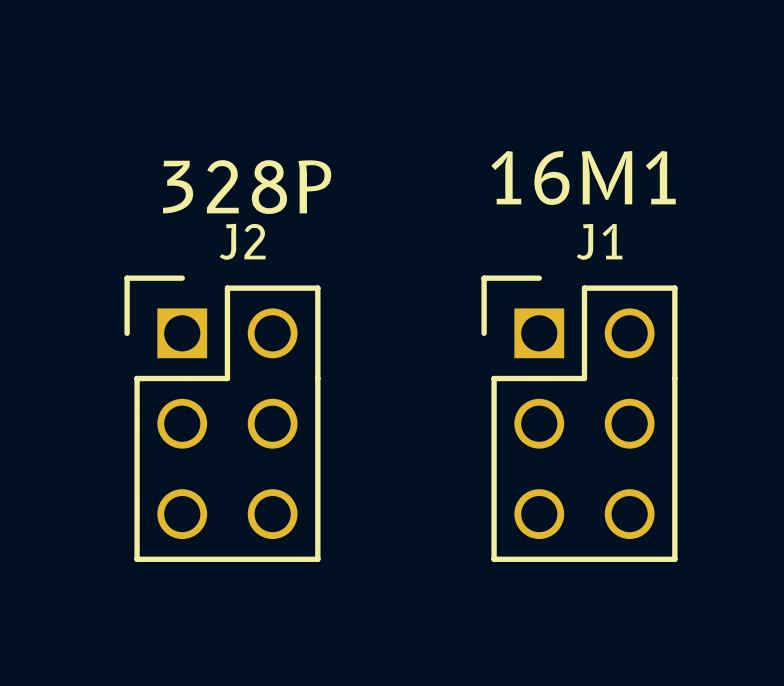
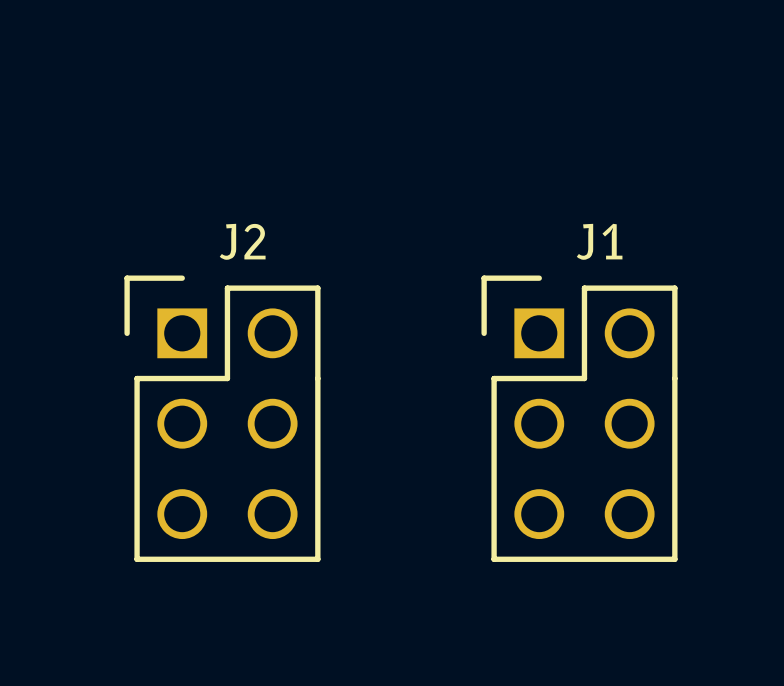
text: 16M1 (583, 177) -> none
text: 328P (247, 187) -> none

